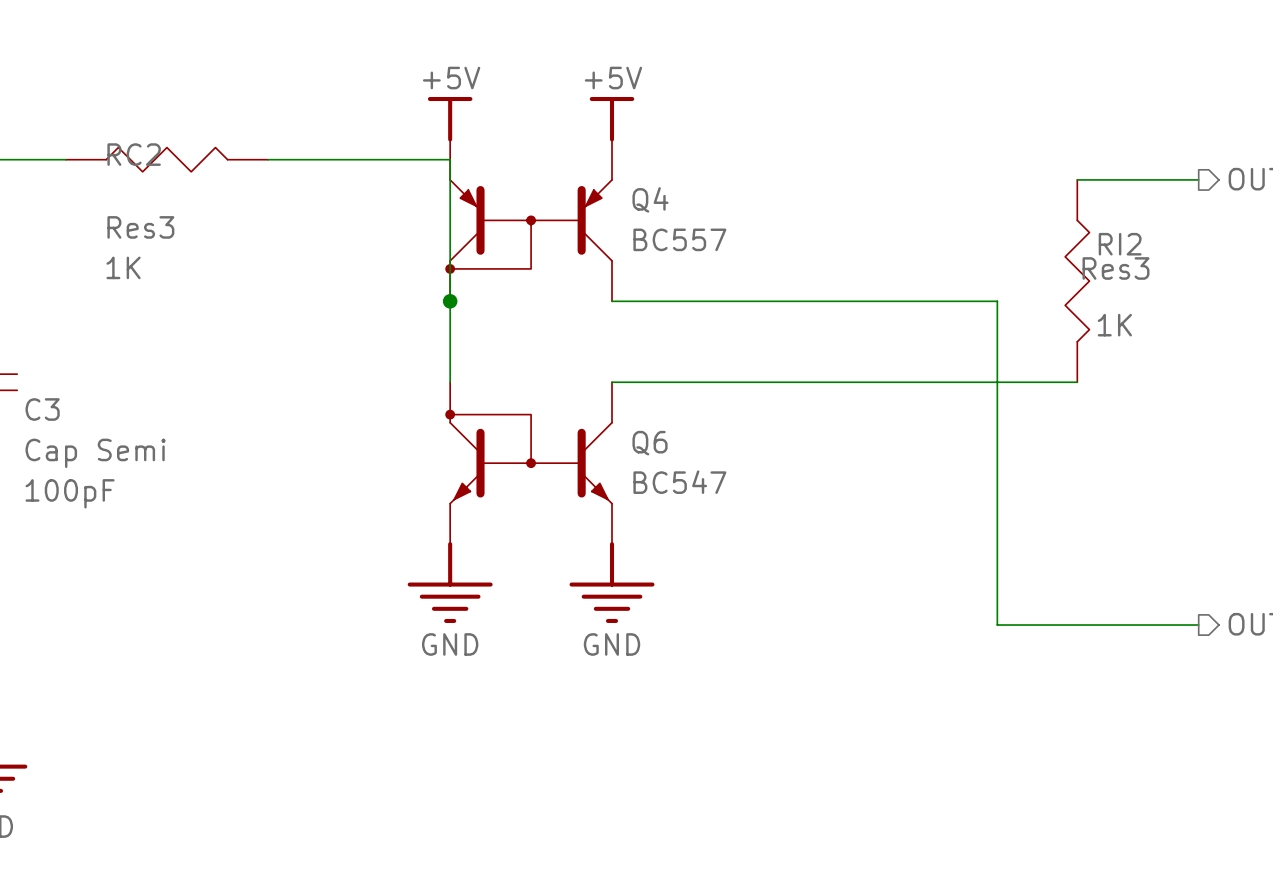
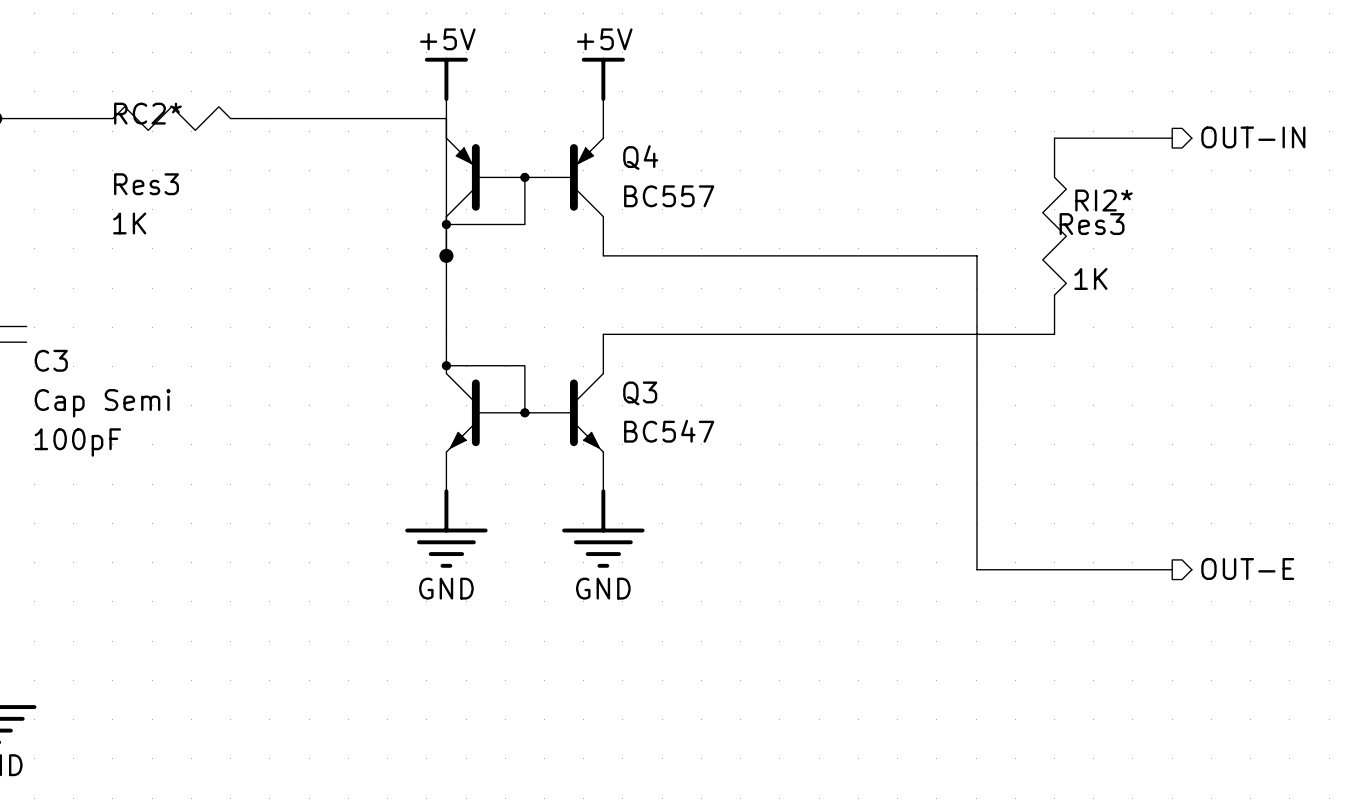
RC2 name: RC2 (134, 154) -> RC2* (147, 113)
RI2 name: RI2 (1120, 244) -> RI2* (1104, 200)
Q6 name: Q6 (650, 443) -> Q3 (640, 393)

